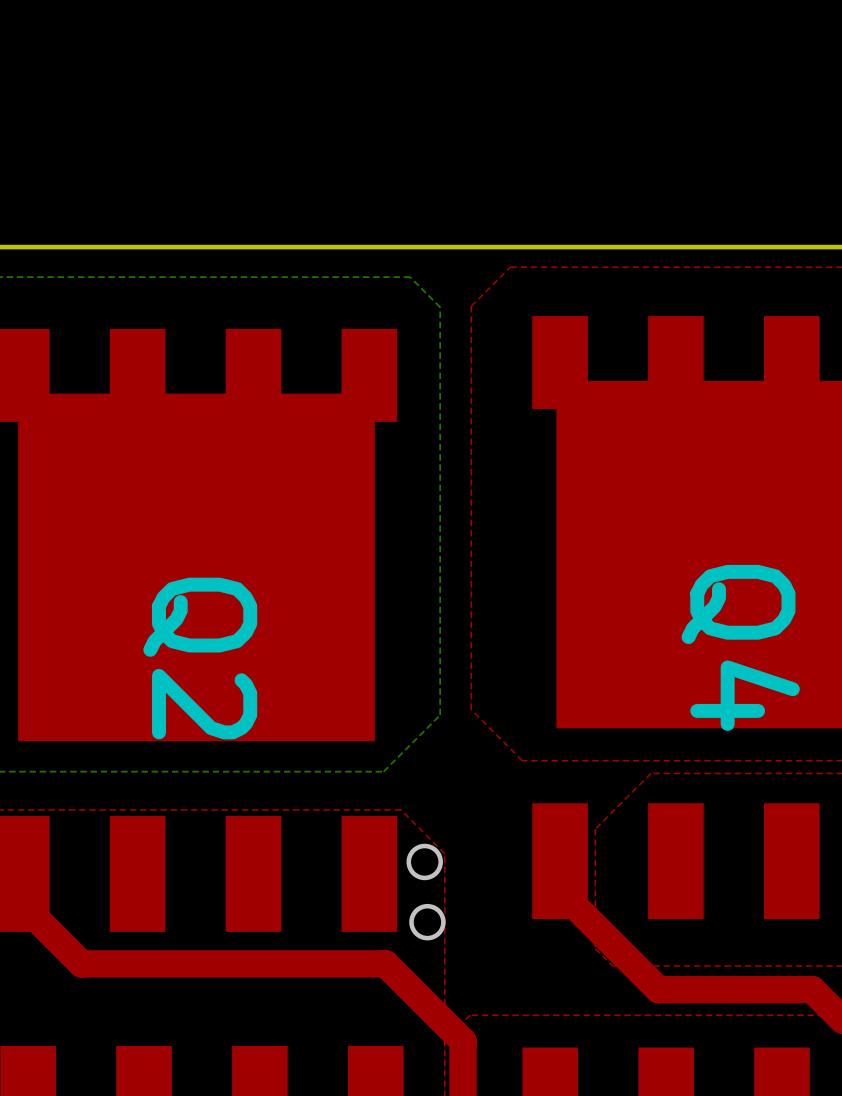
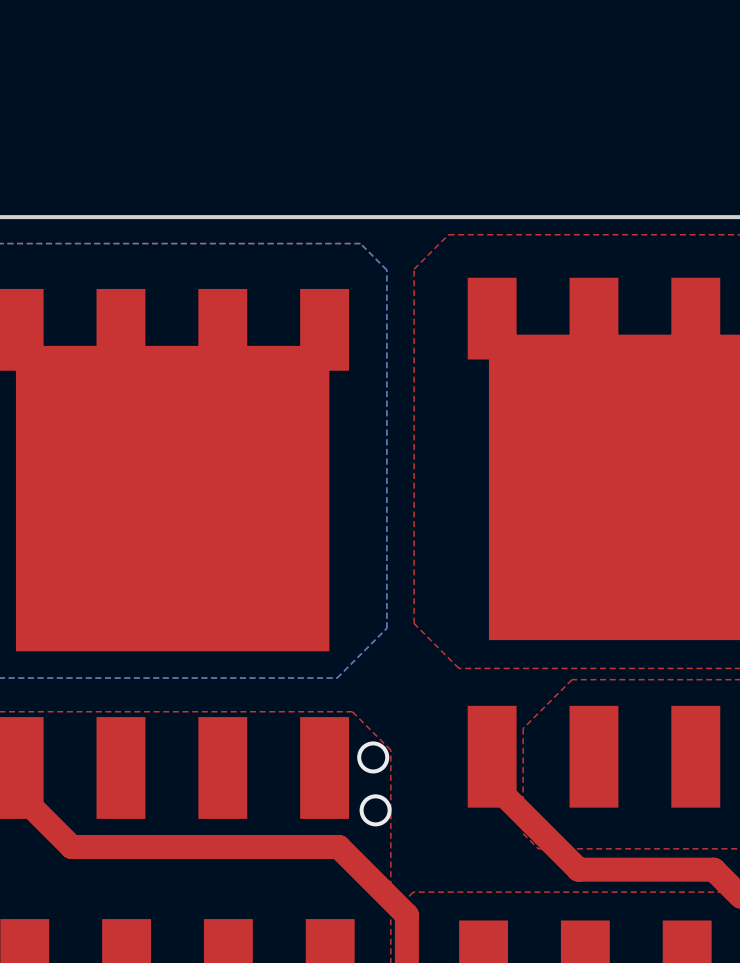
Q4 name: Q4 (740, 647) -> none
Q2 name: Q2 (200, 658) -> none

